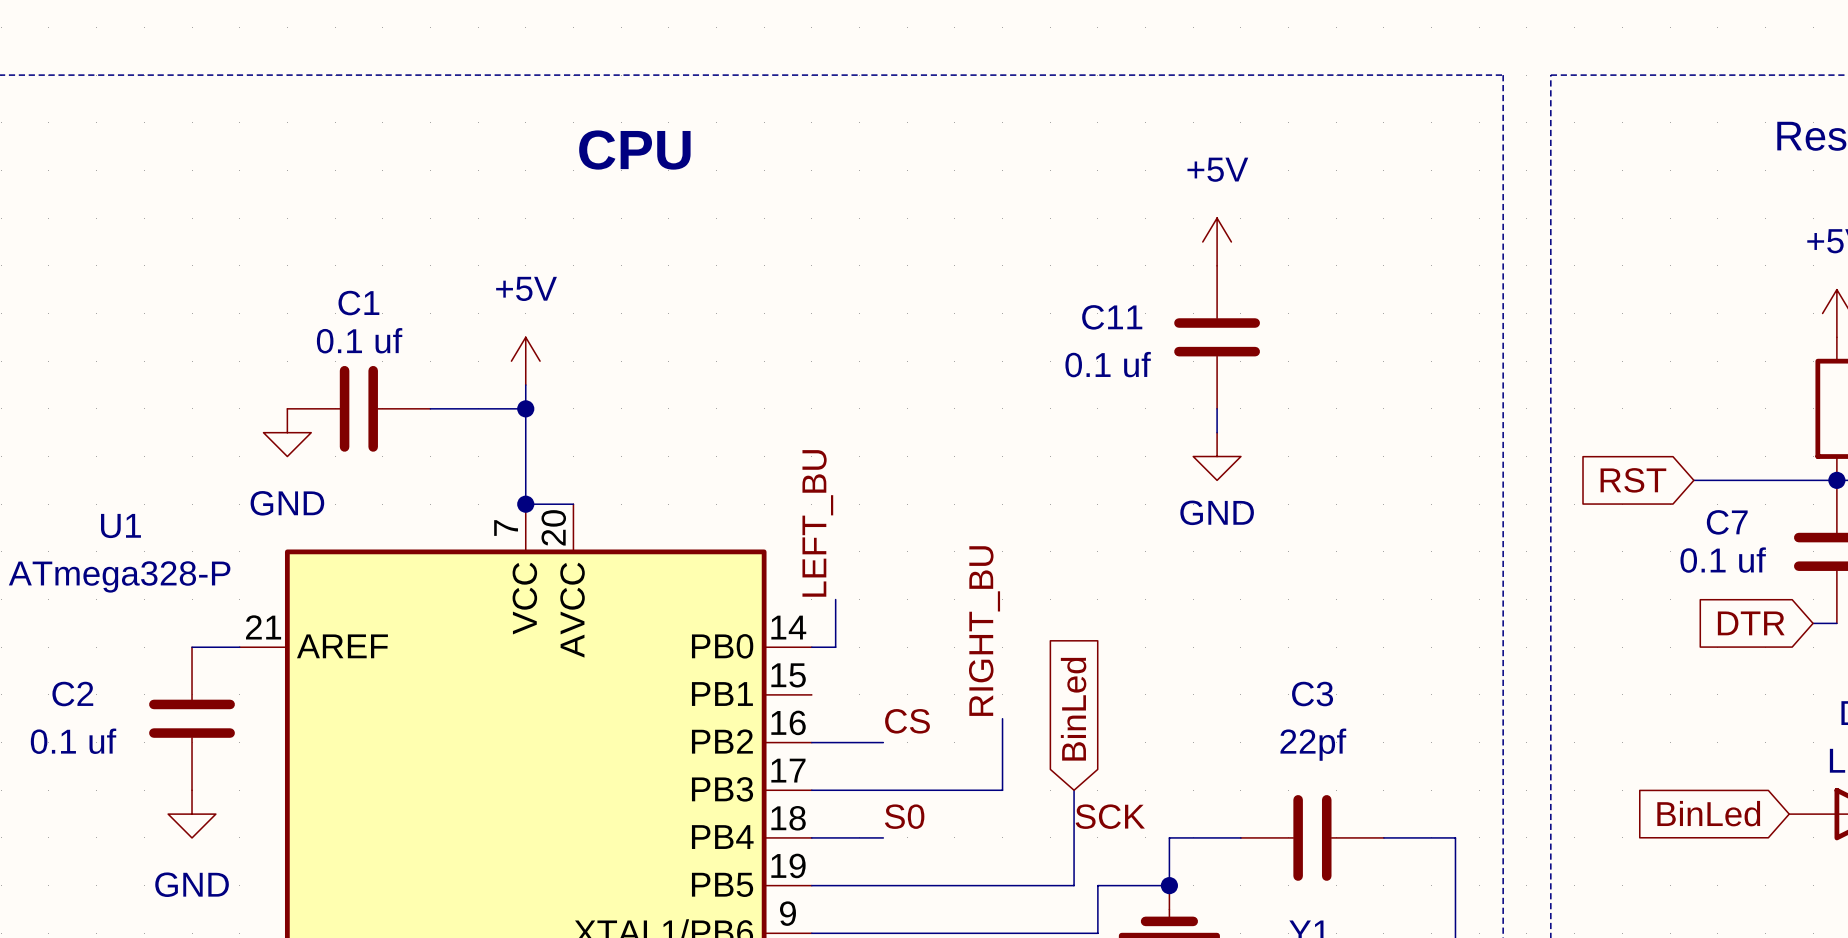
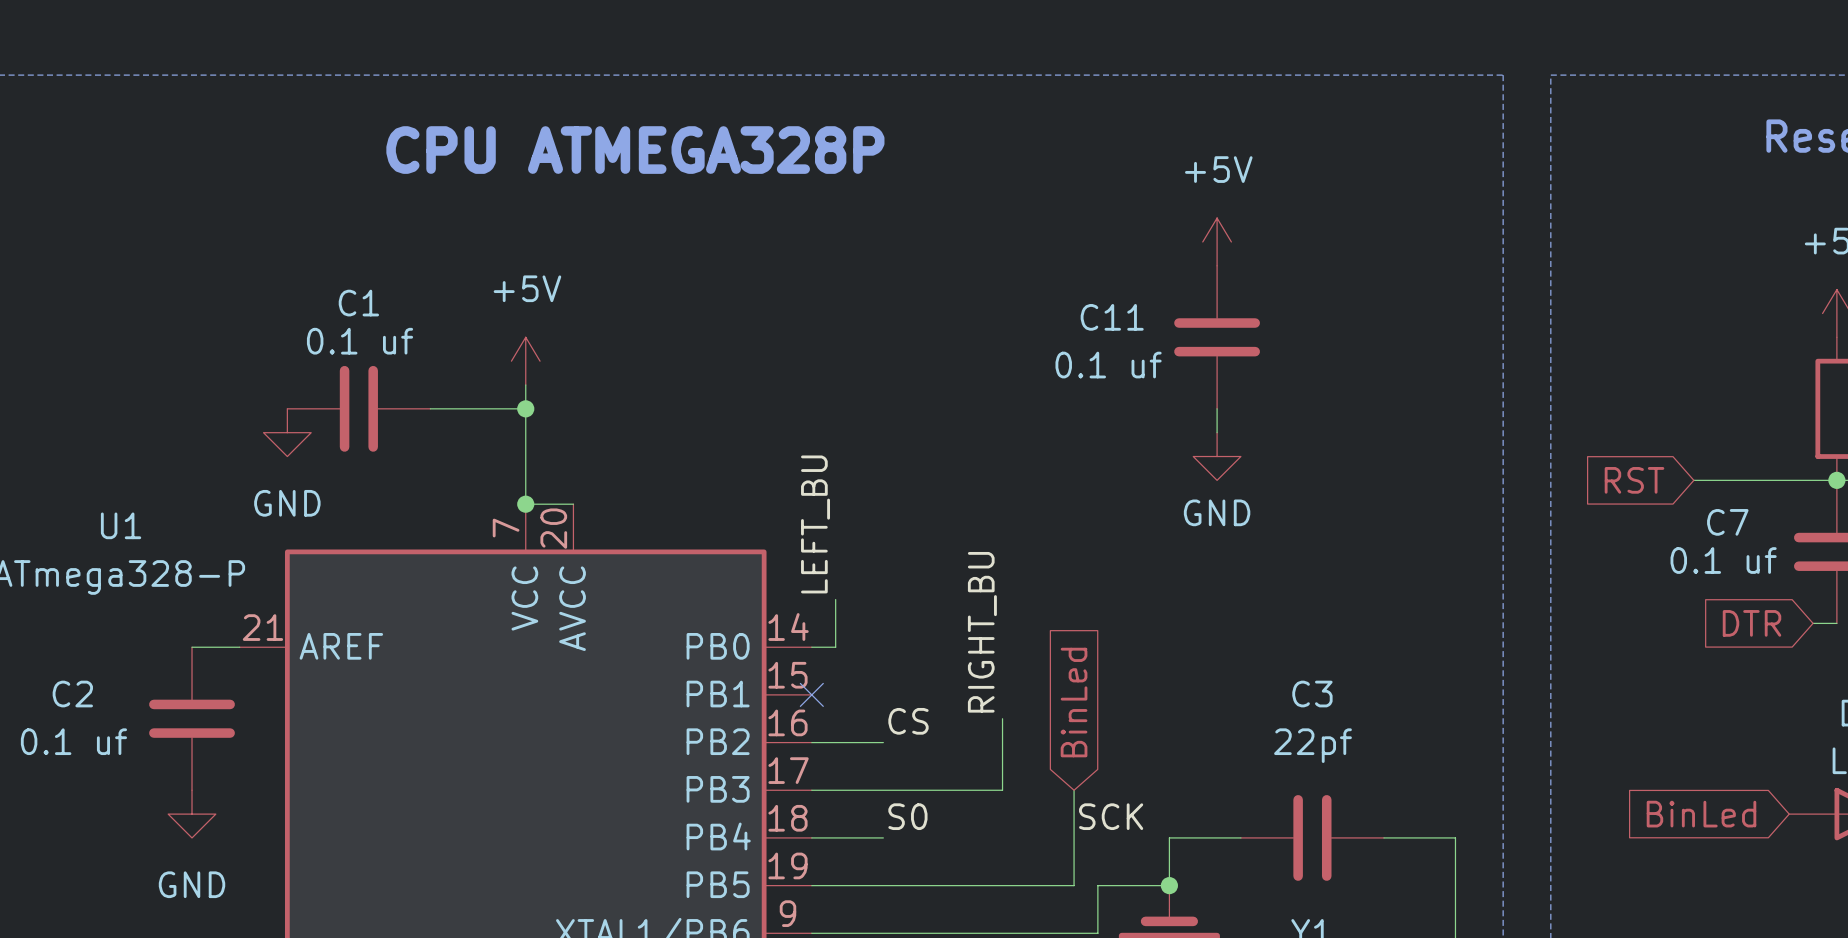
text: CPU (634, 150) -> CPU ATMEGA328P (635, 150)
no-connect mark: none -> (811, 694)

